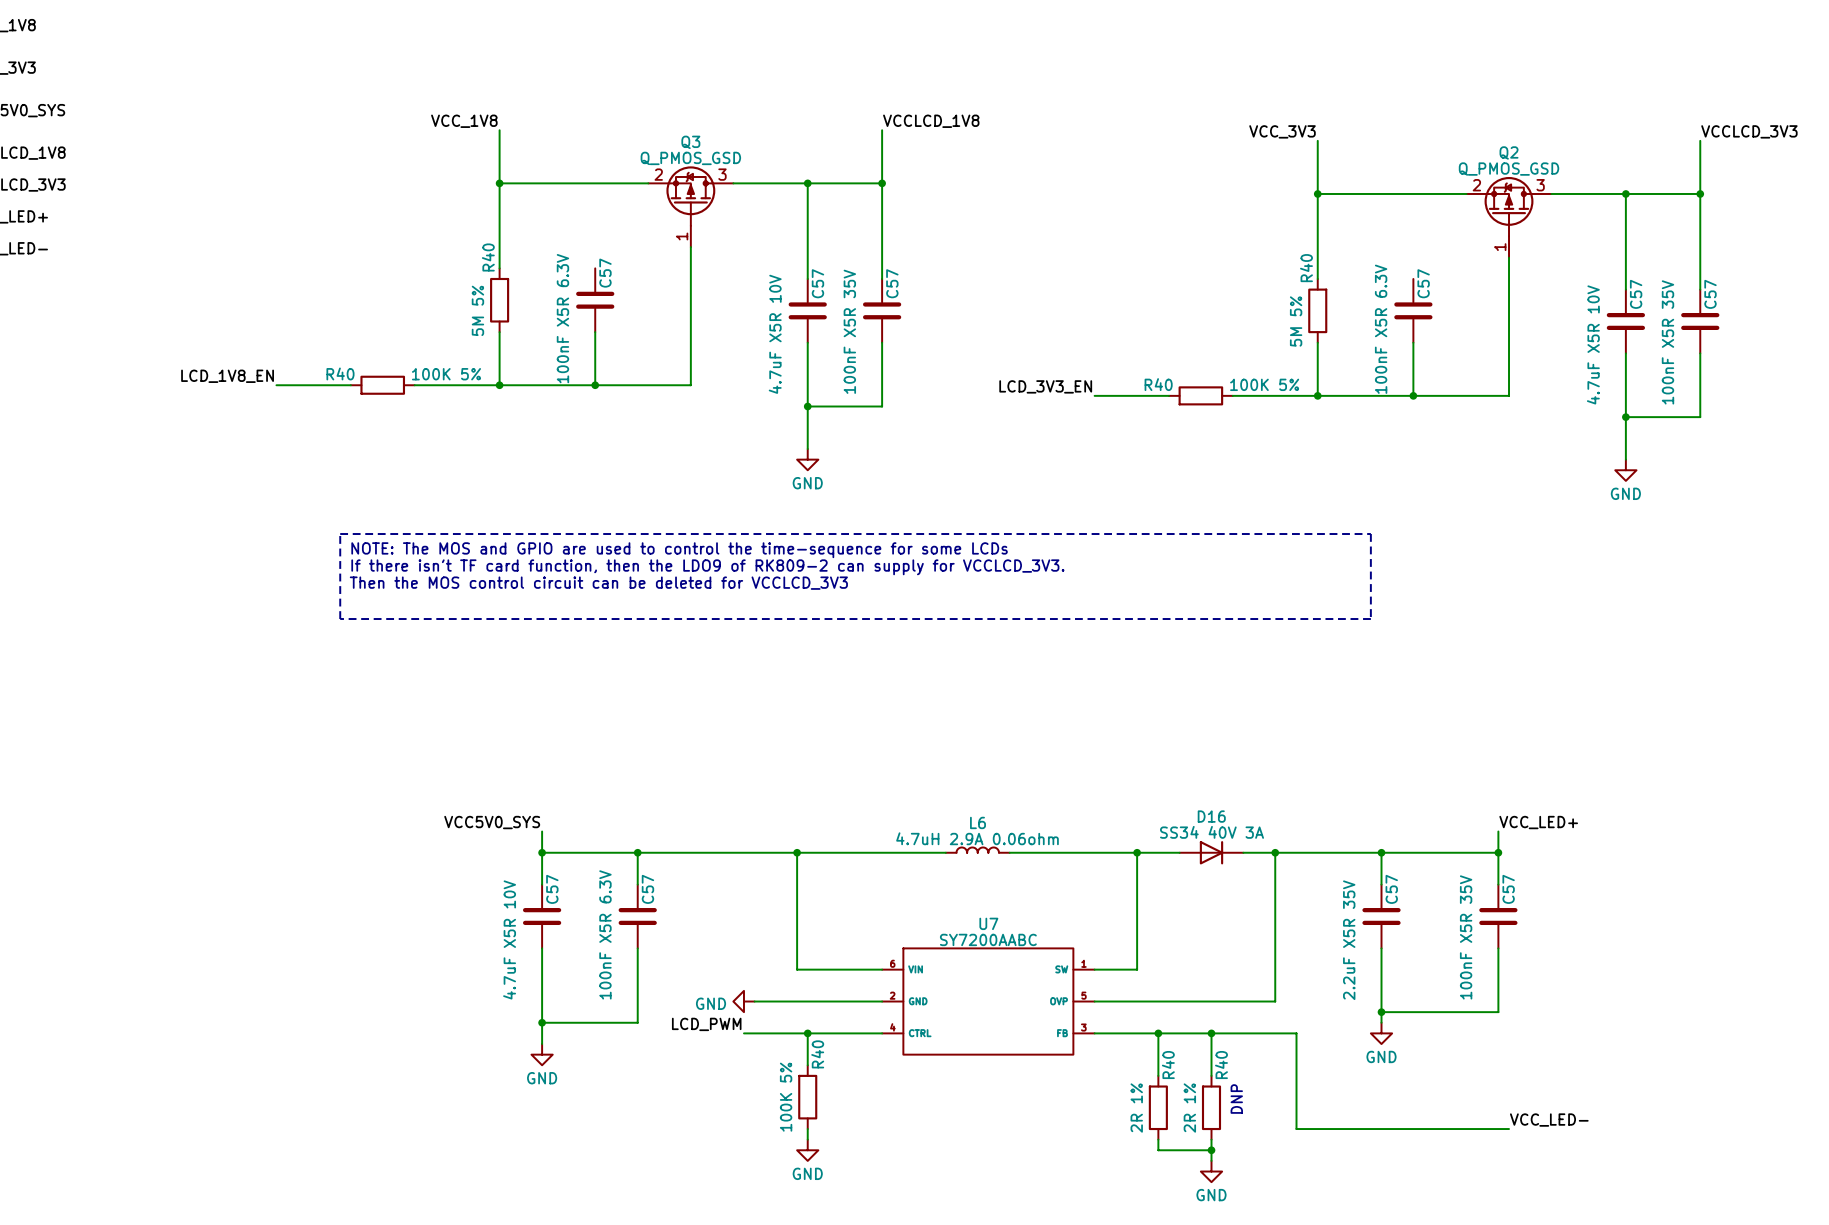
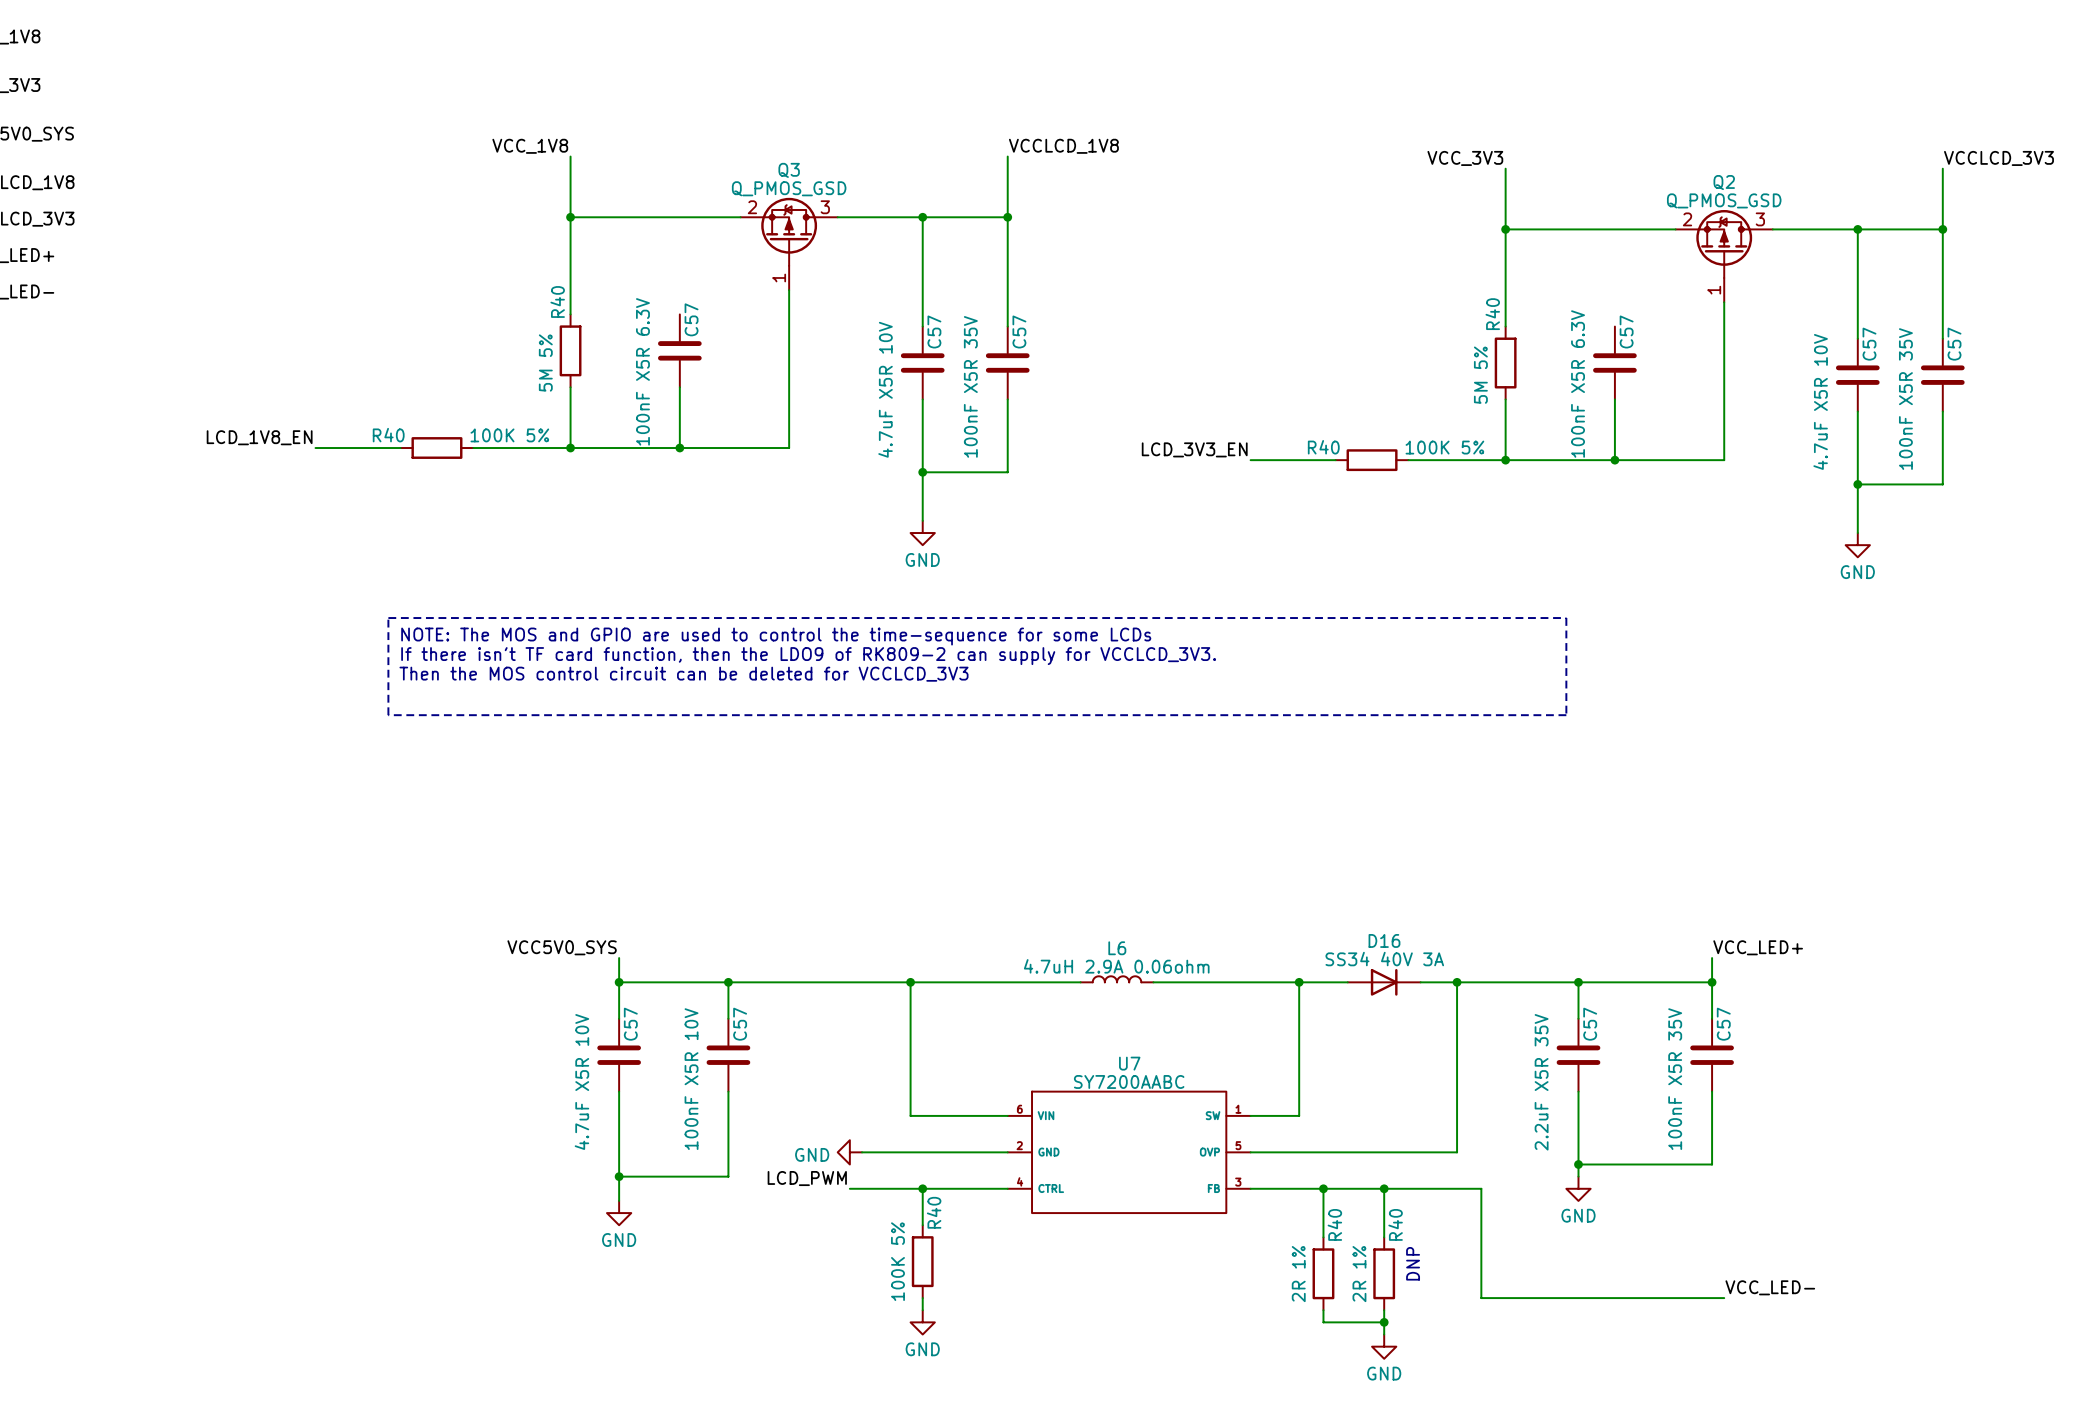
C57 value: 100nF X5R 6.3V (605, 934) -> 100nF X5R 10V (691, 1079)

